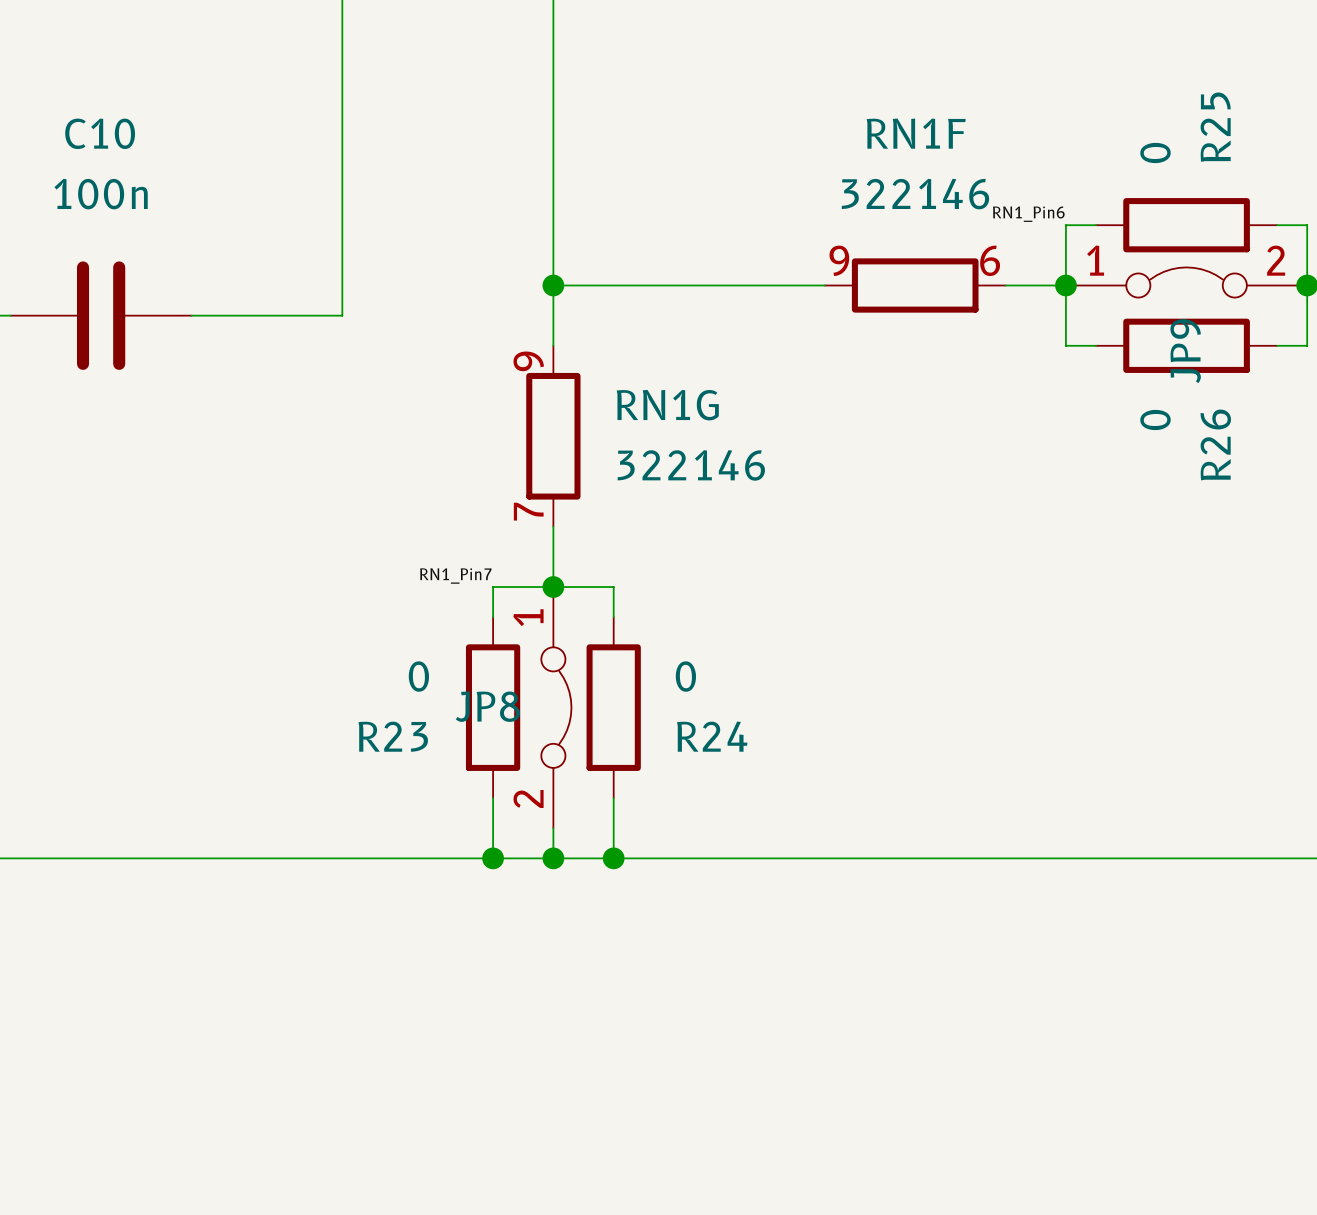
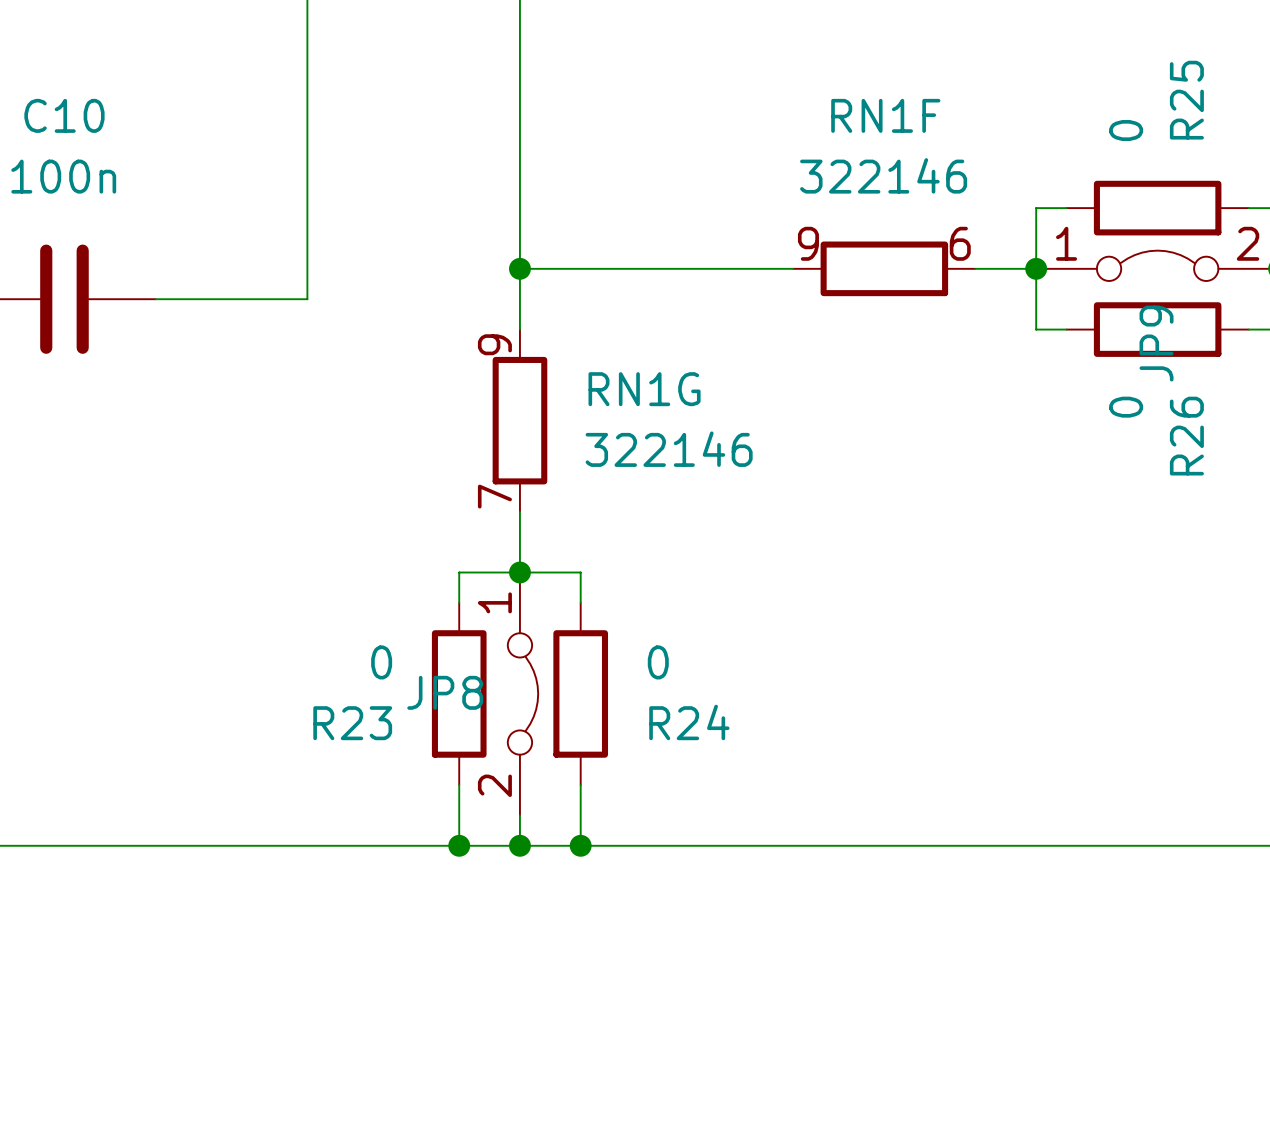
label: RN1_Pin6 (1028, 214) -> none
label: RN1_Pin7 (455, 576) -> none

